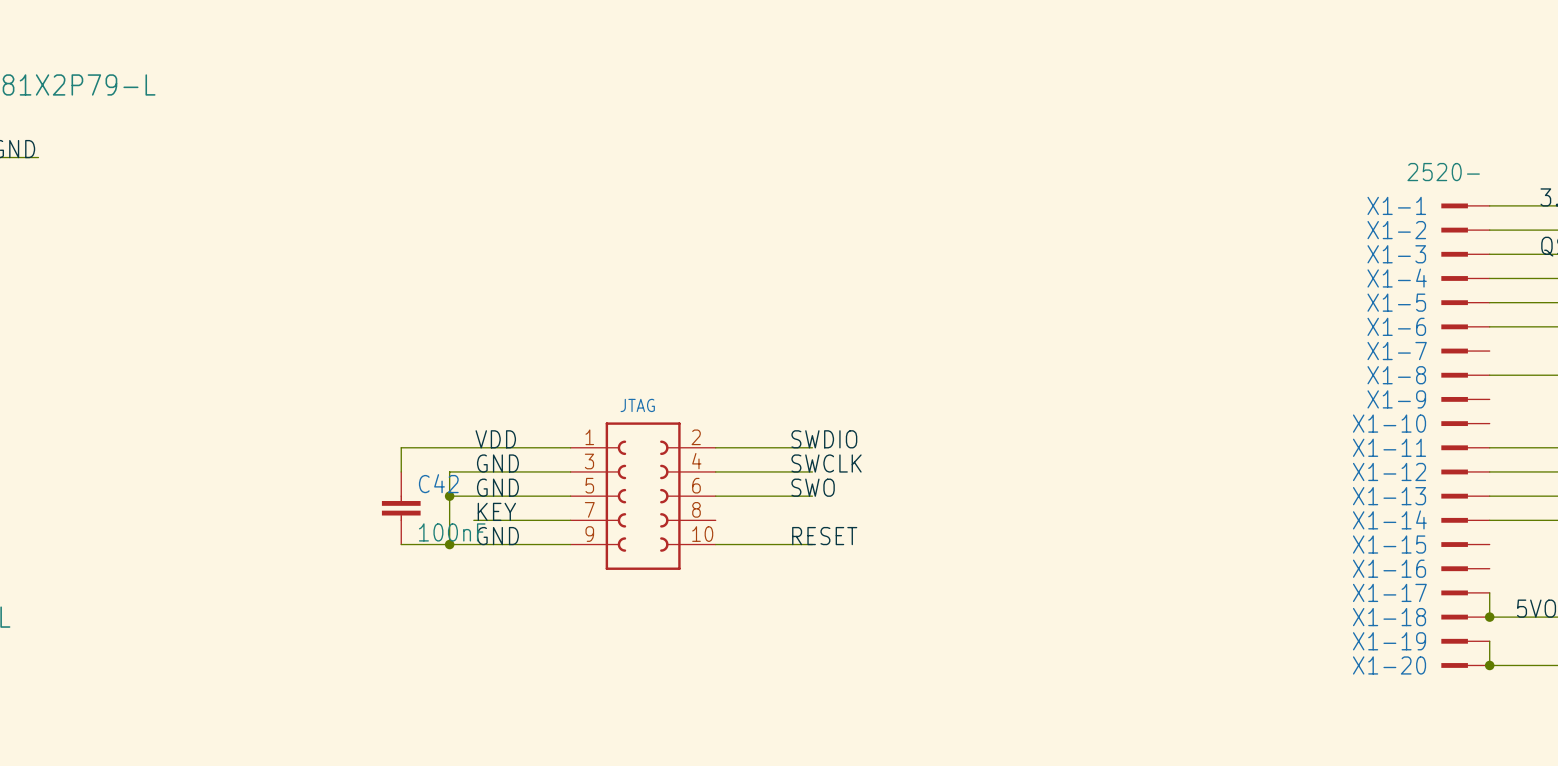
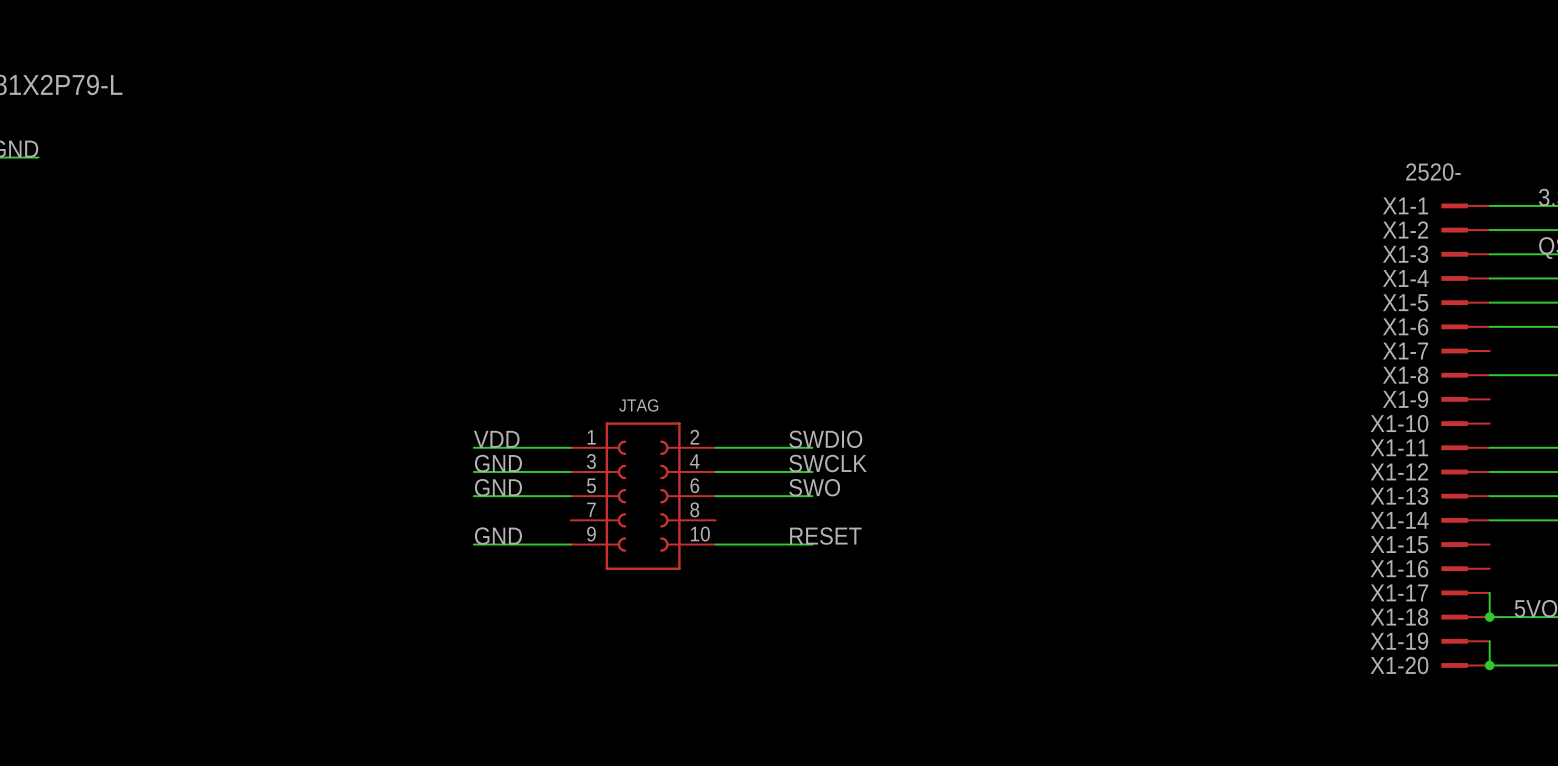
wire: (473, 447) (401, 447) (401, 471) -> none
wire: (473, 471) (449, 471) (449, 544) -> none
wire: (449, 496) (473, 496) -> none
junction: (449, 496) -> none
C42: 100nF (401, 508) -> none
label: KEY (496, 511) -> none
wire: (473, 520) (570, 520) -> none
wire: (401, 544) (473, 544) -> none
junction: (449, 544) -> none

